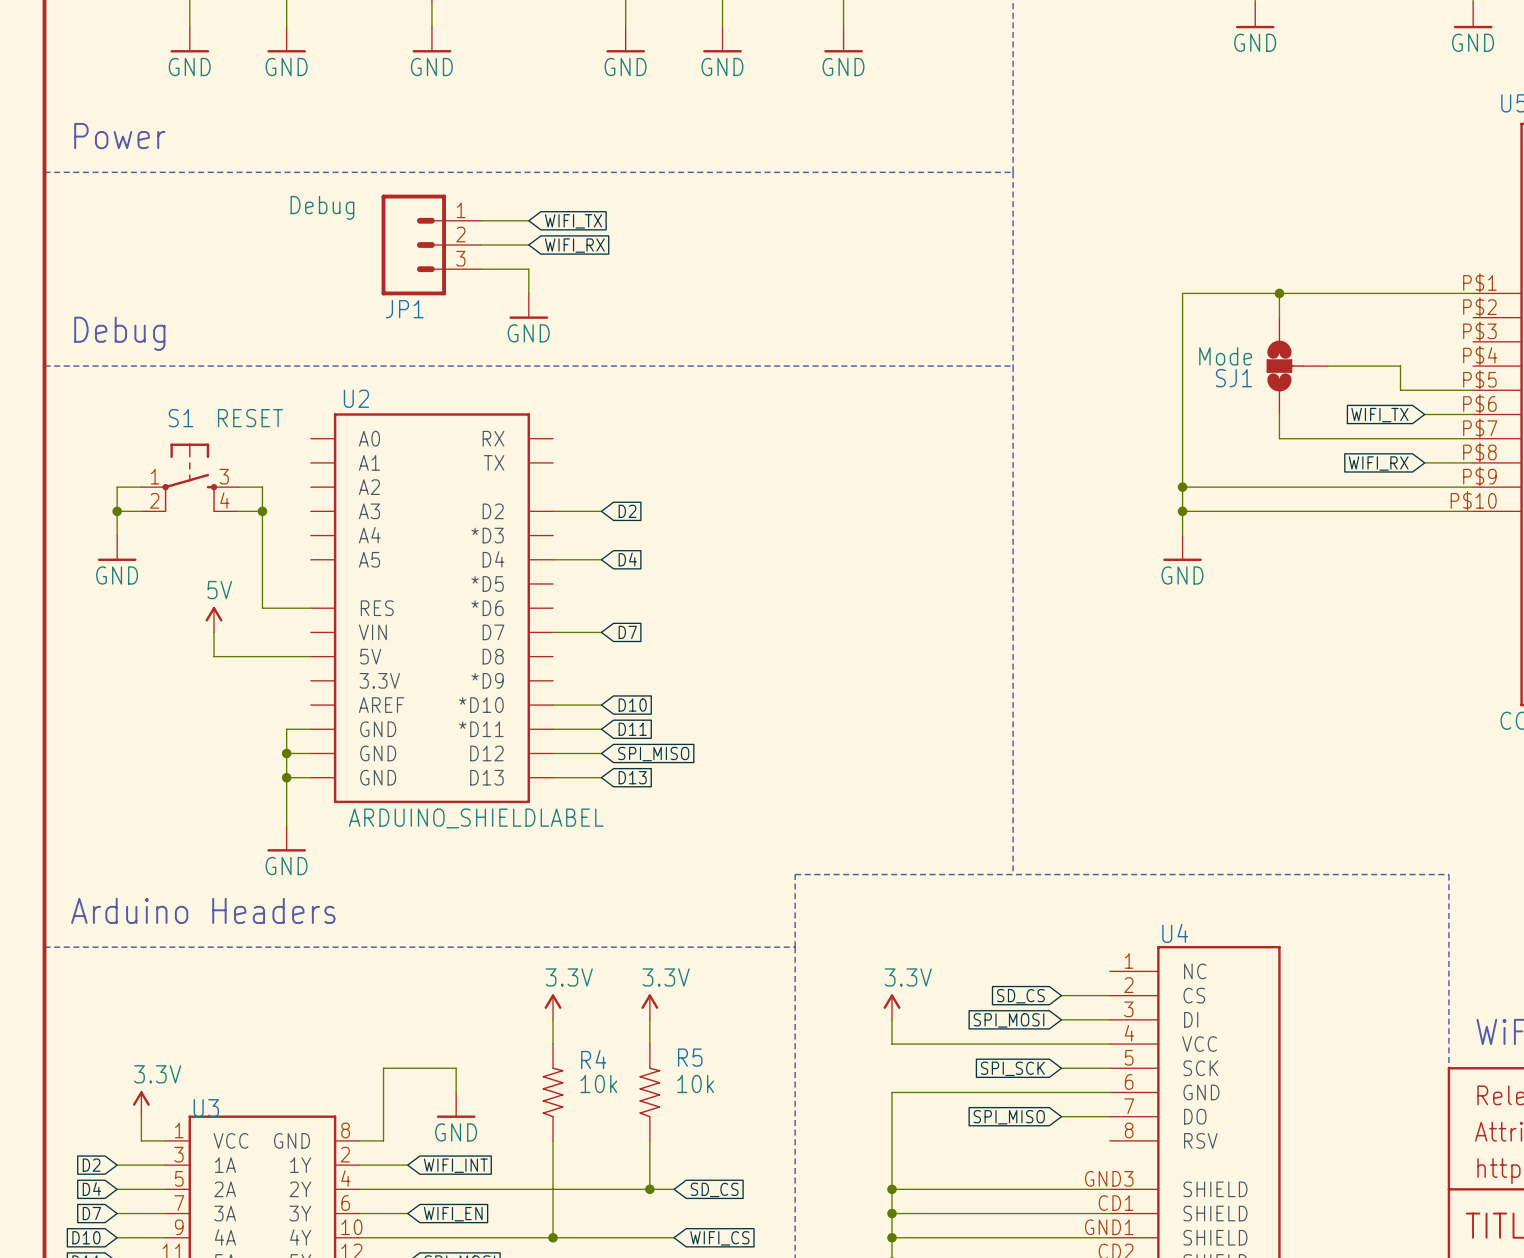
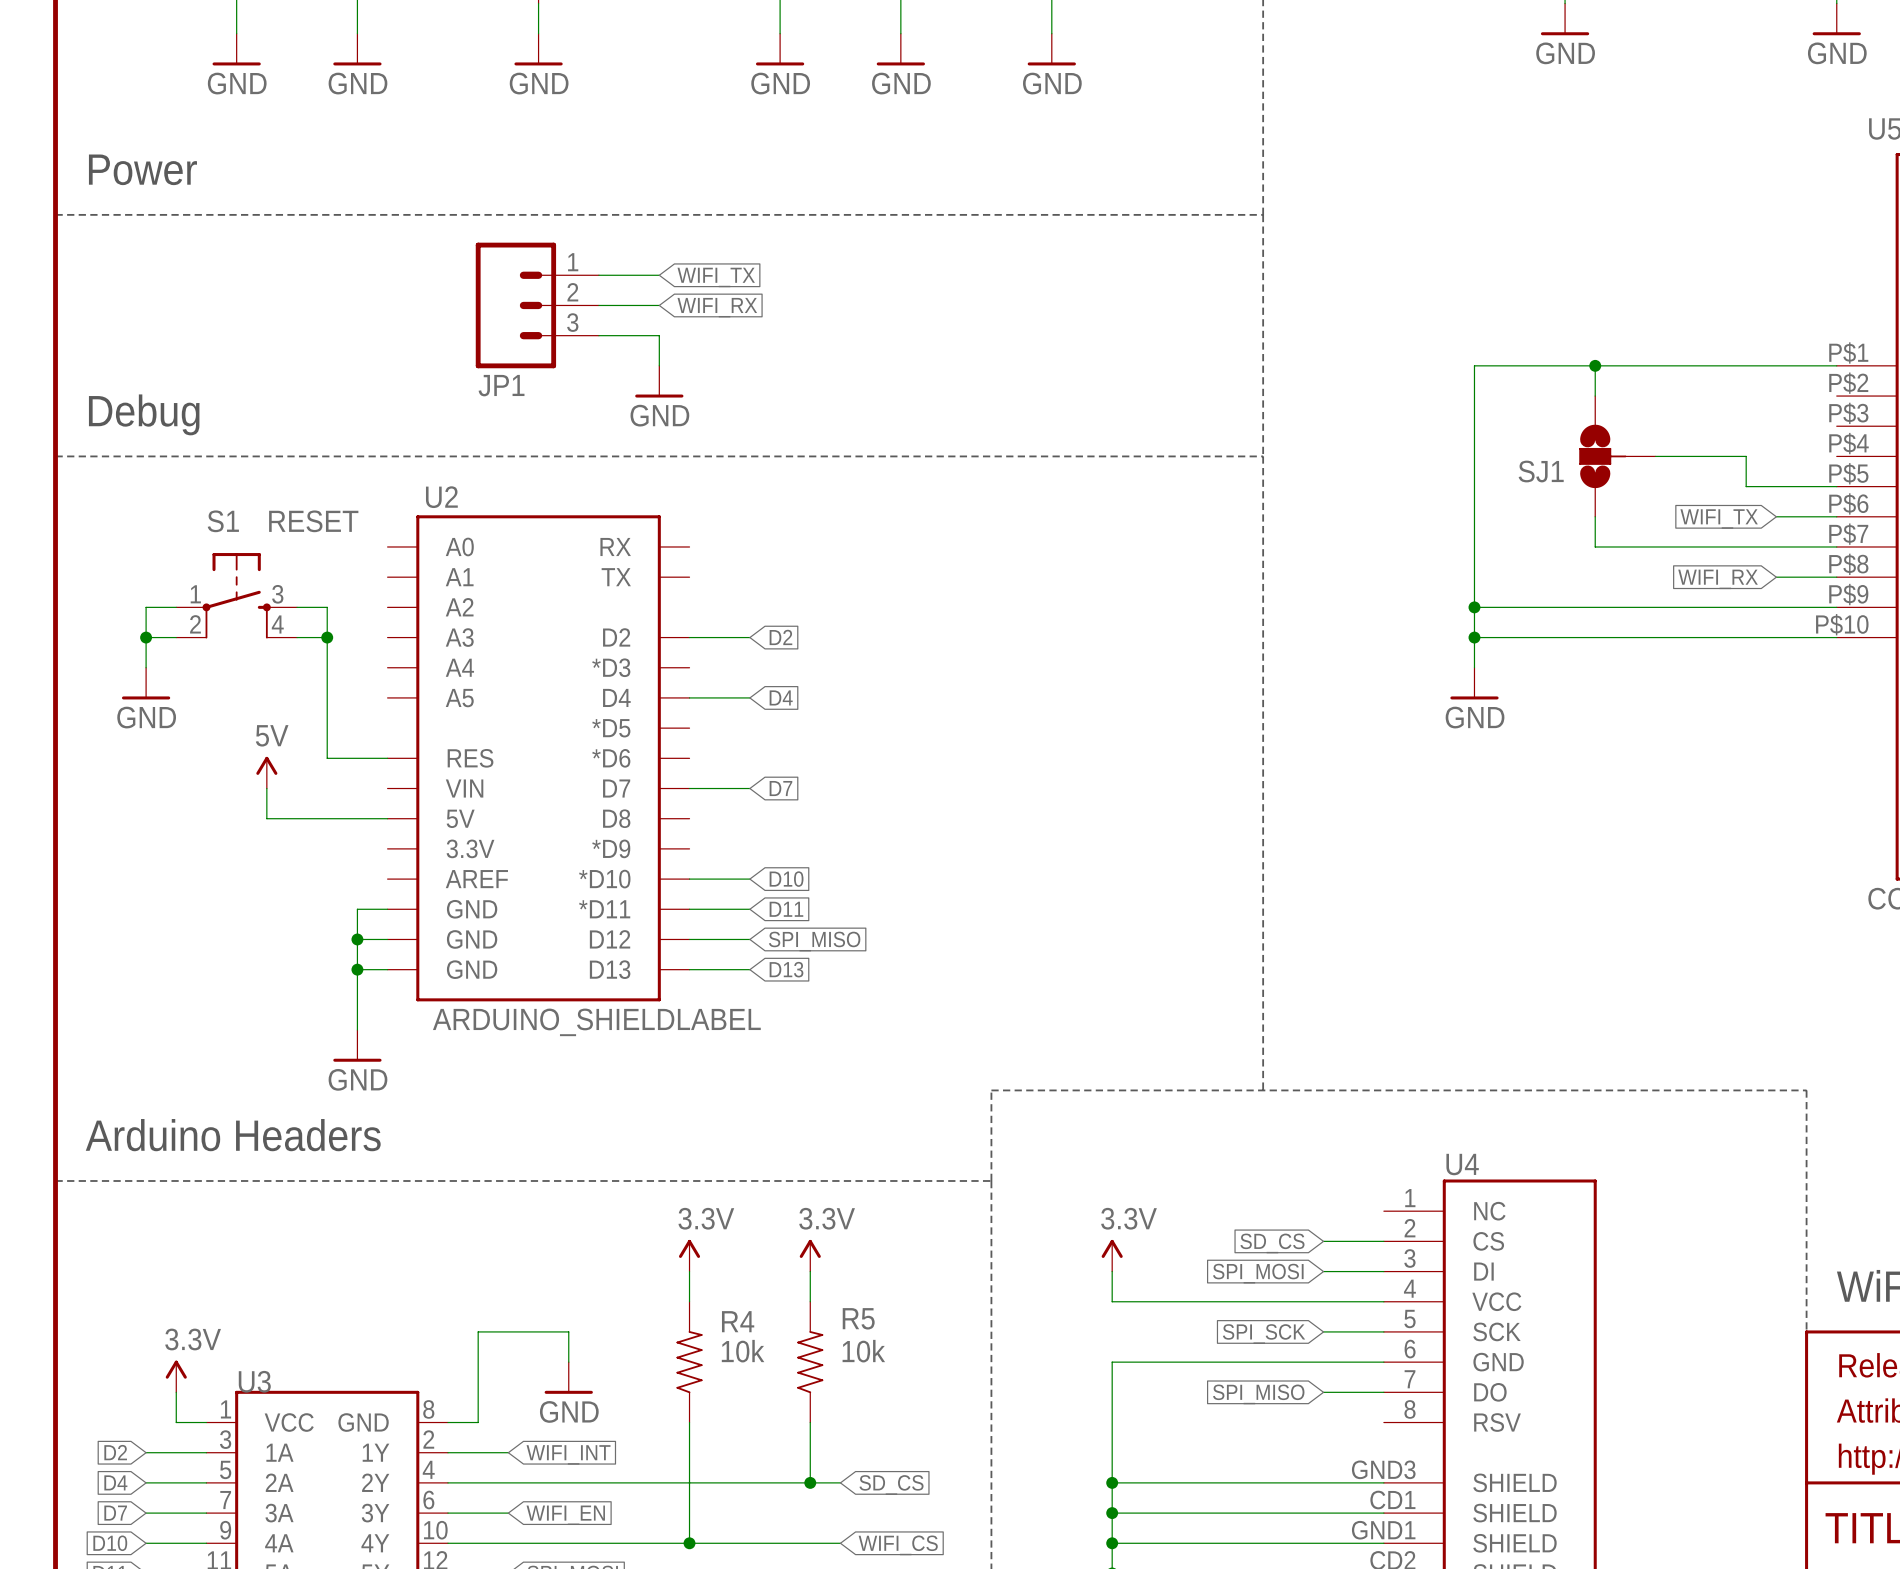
JP1 value: Debug (322, 207) -> none
SJ1 value: Mode (1225, 356) -> none

